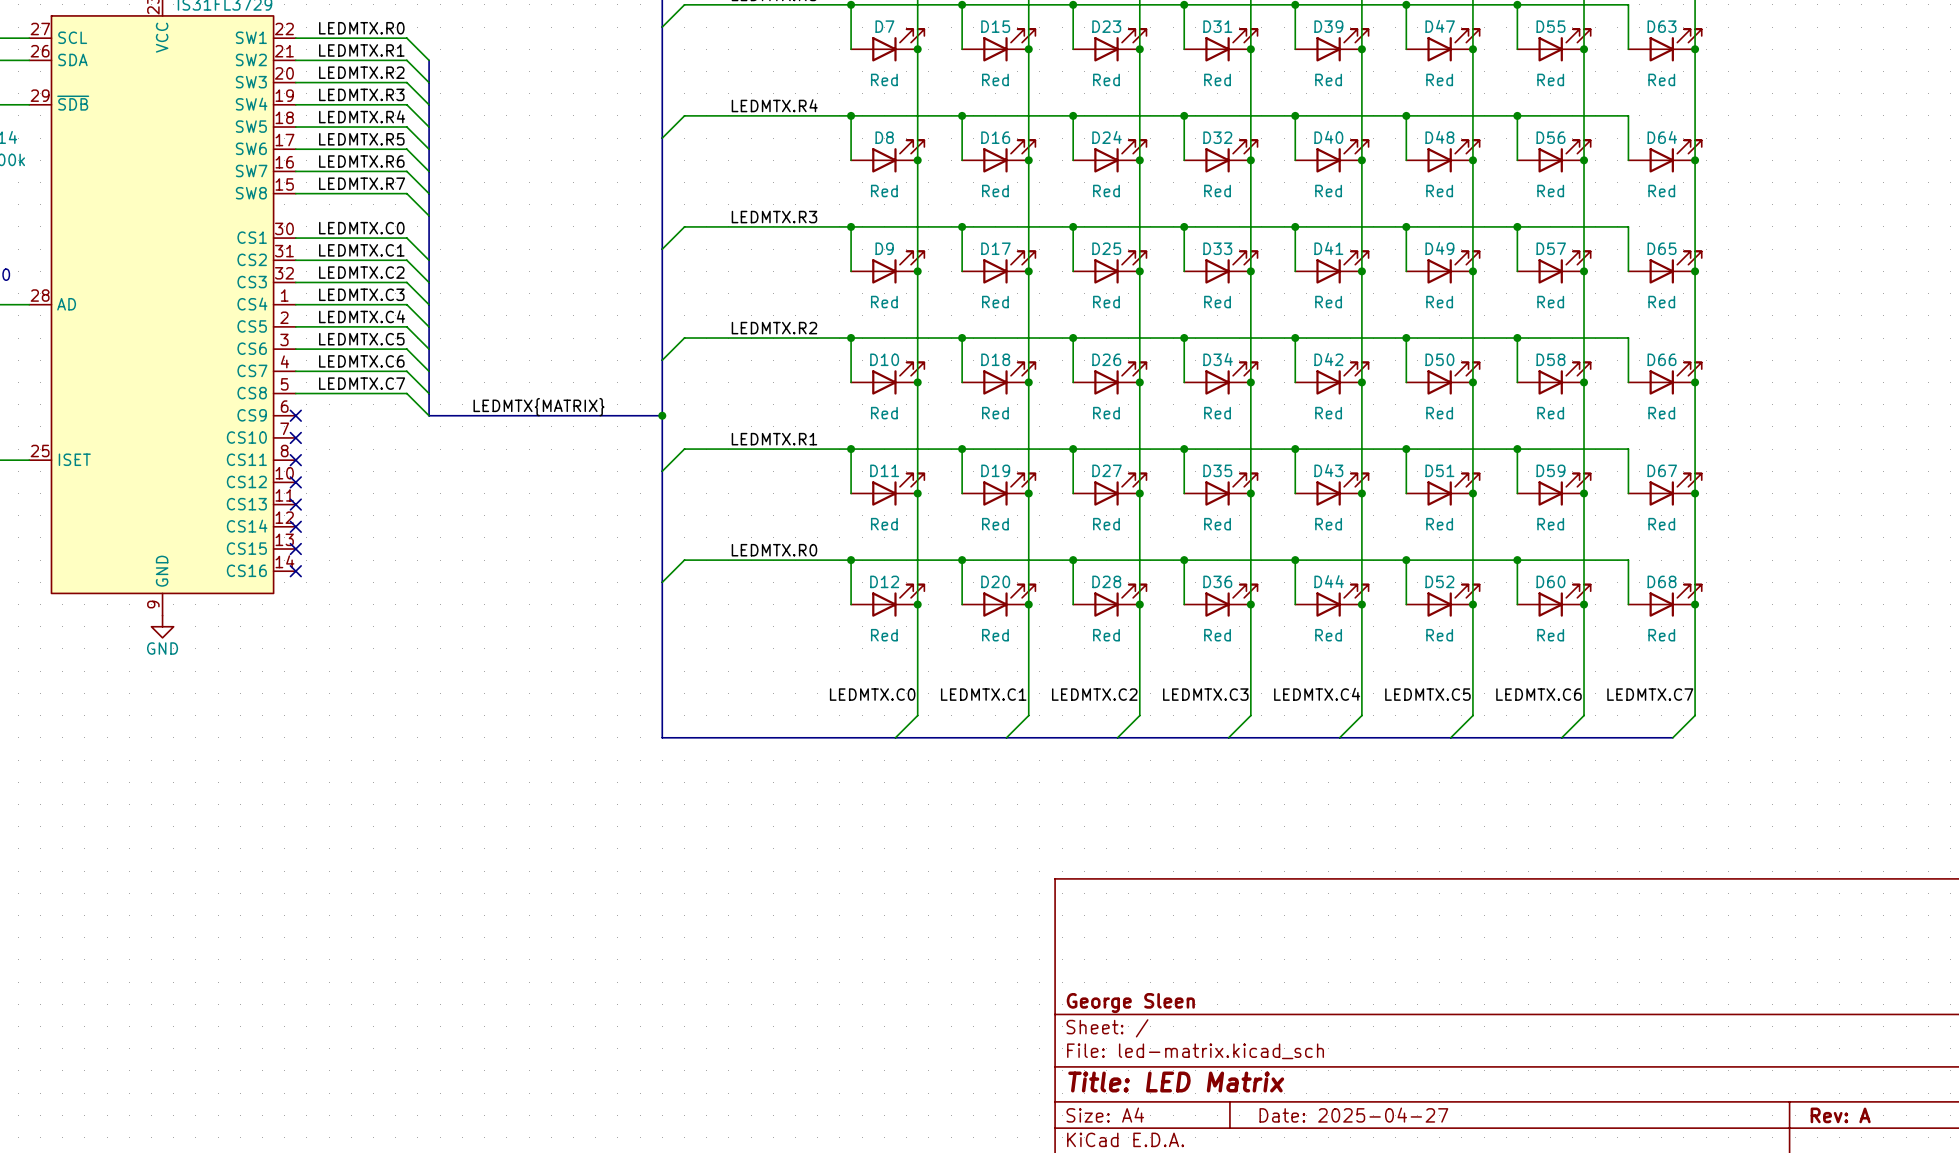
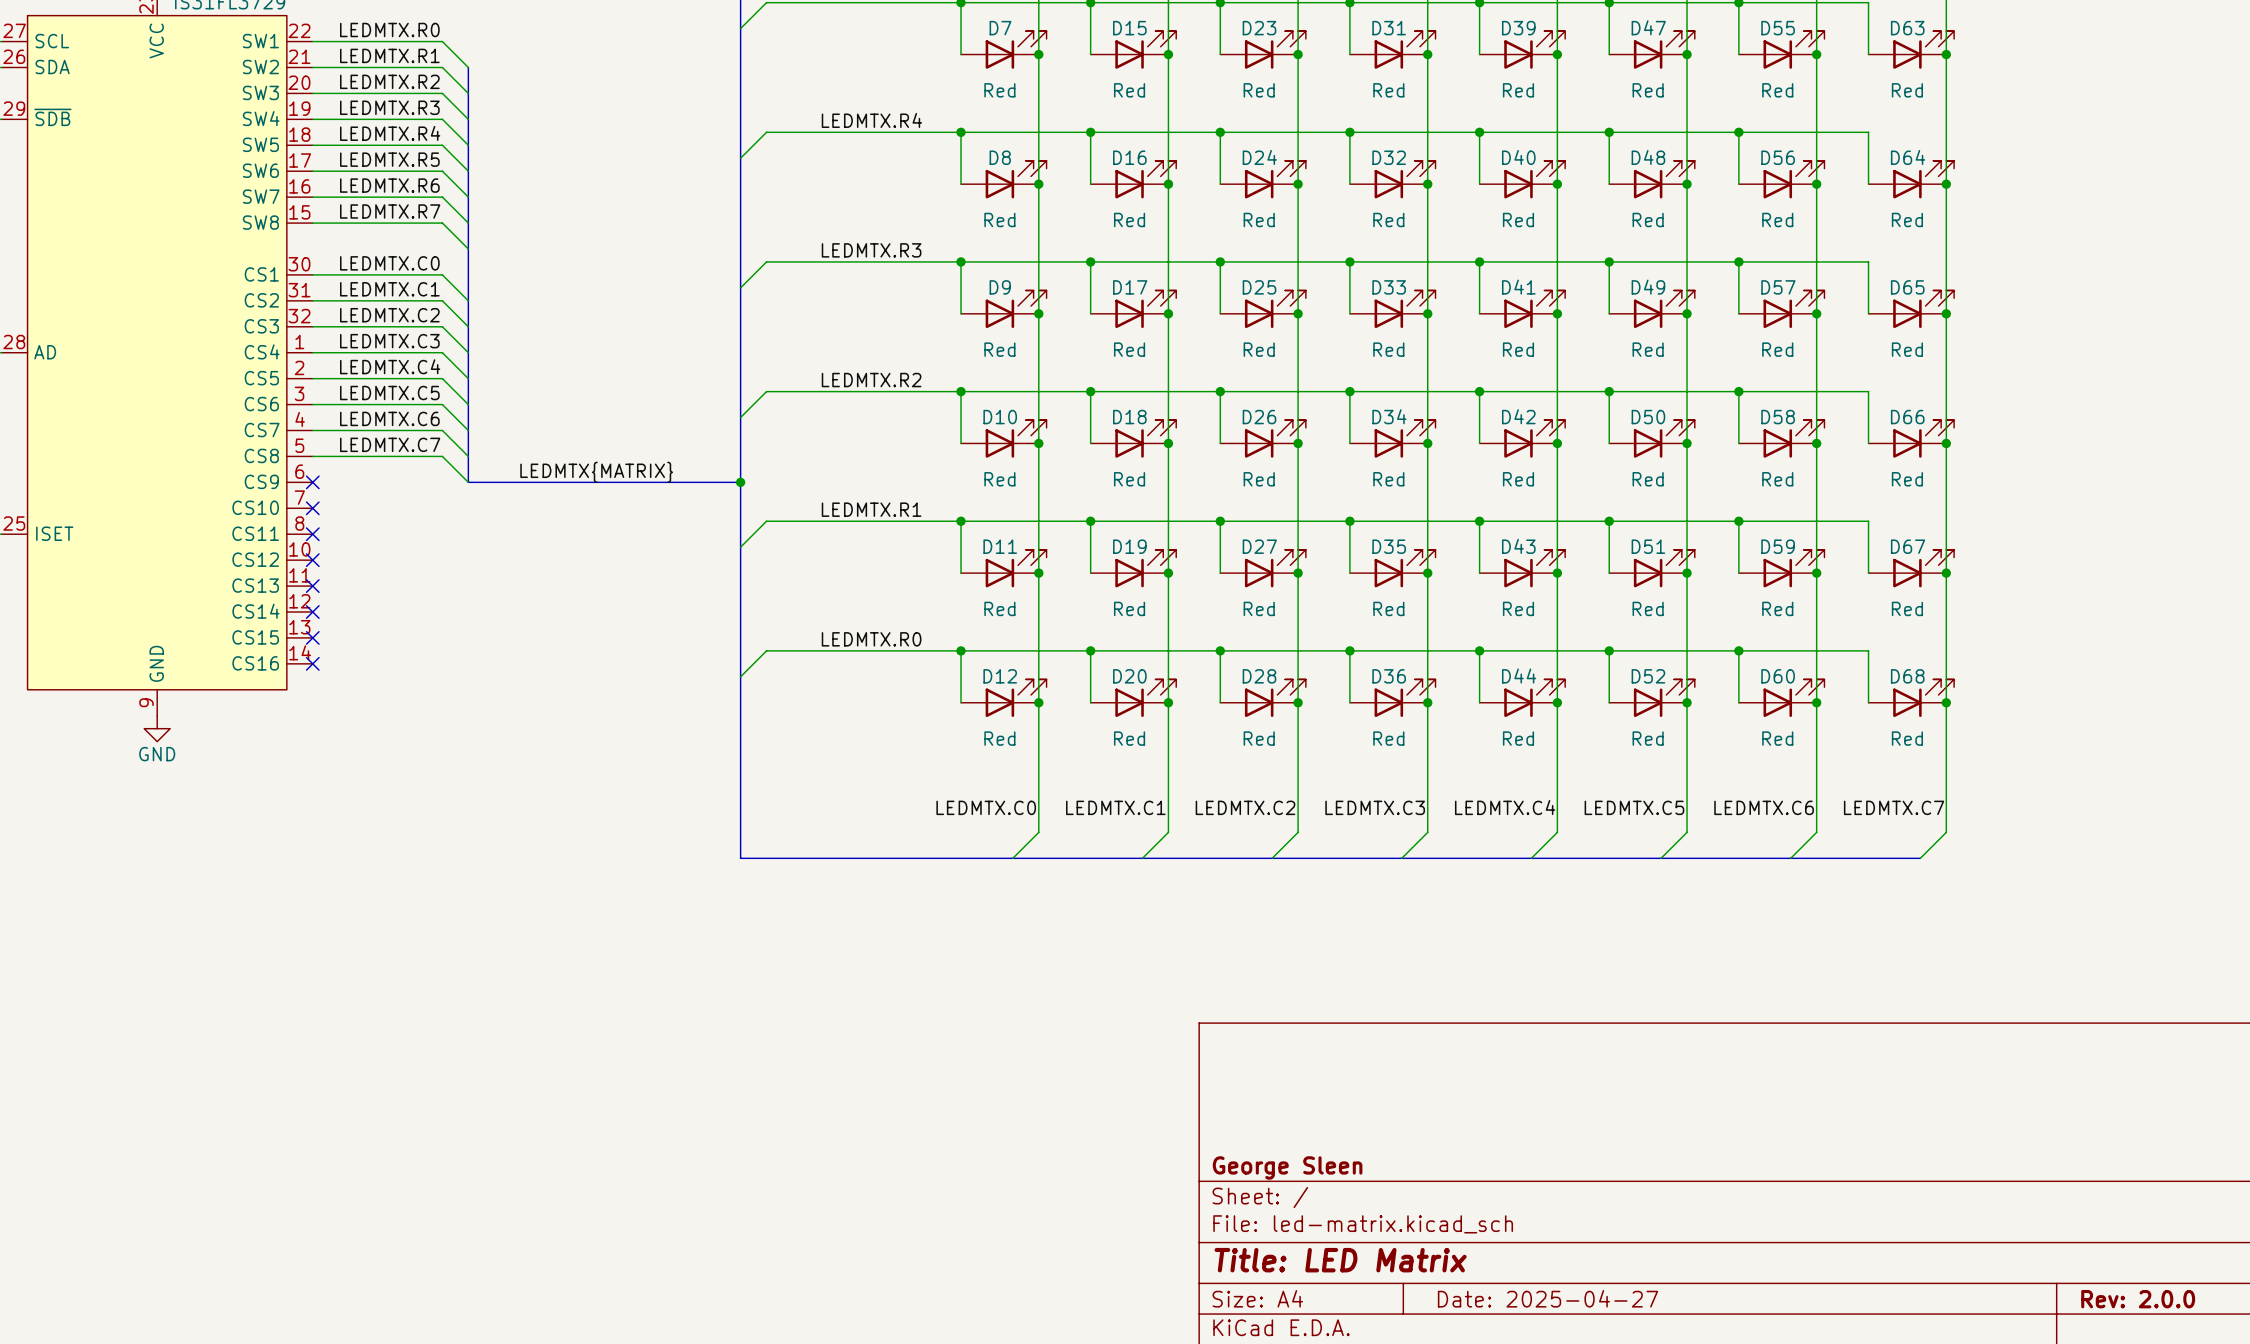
title block: Rev: A (1840, 1115) -> Rev: 2.0.0 (2138, 1299)

